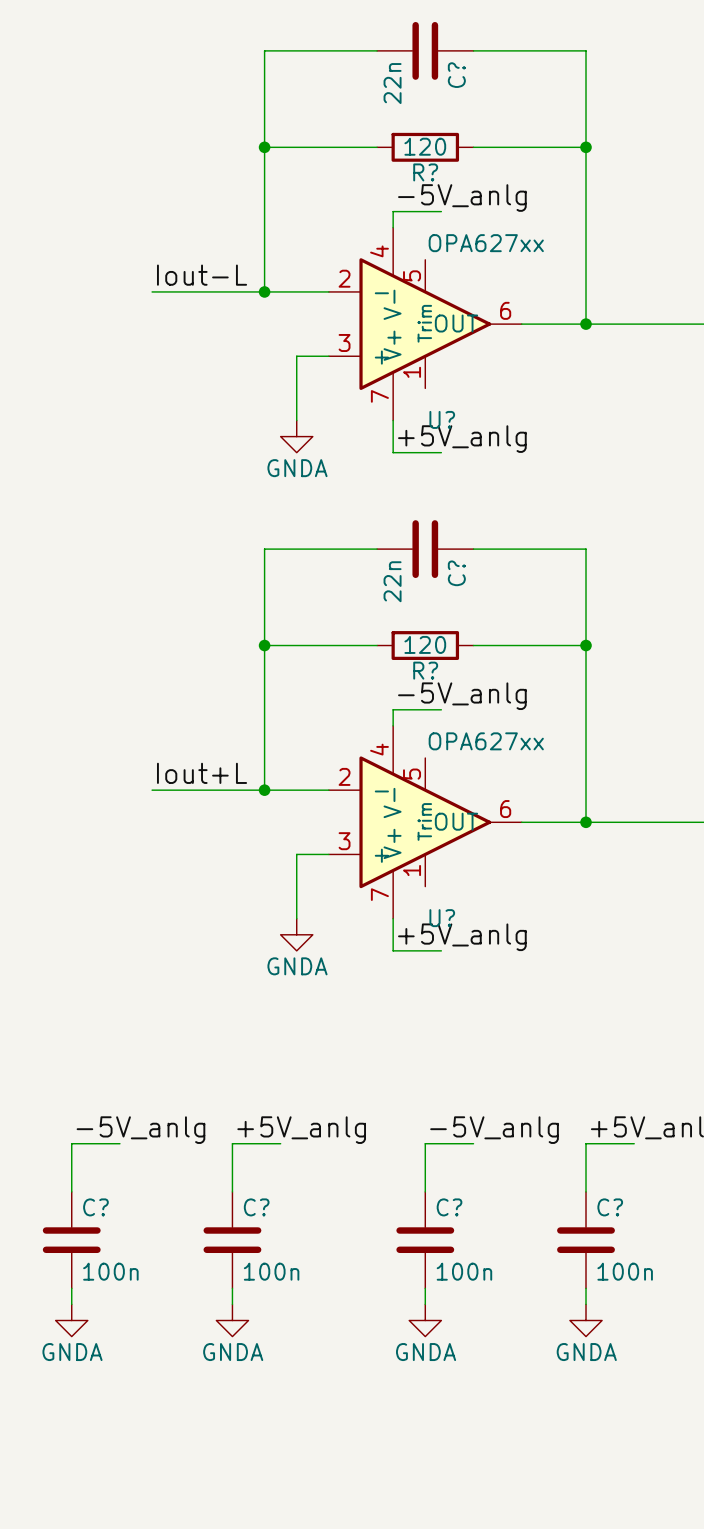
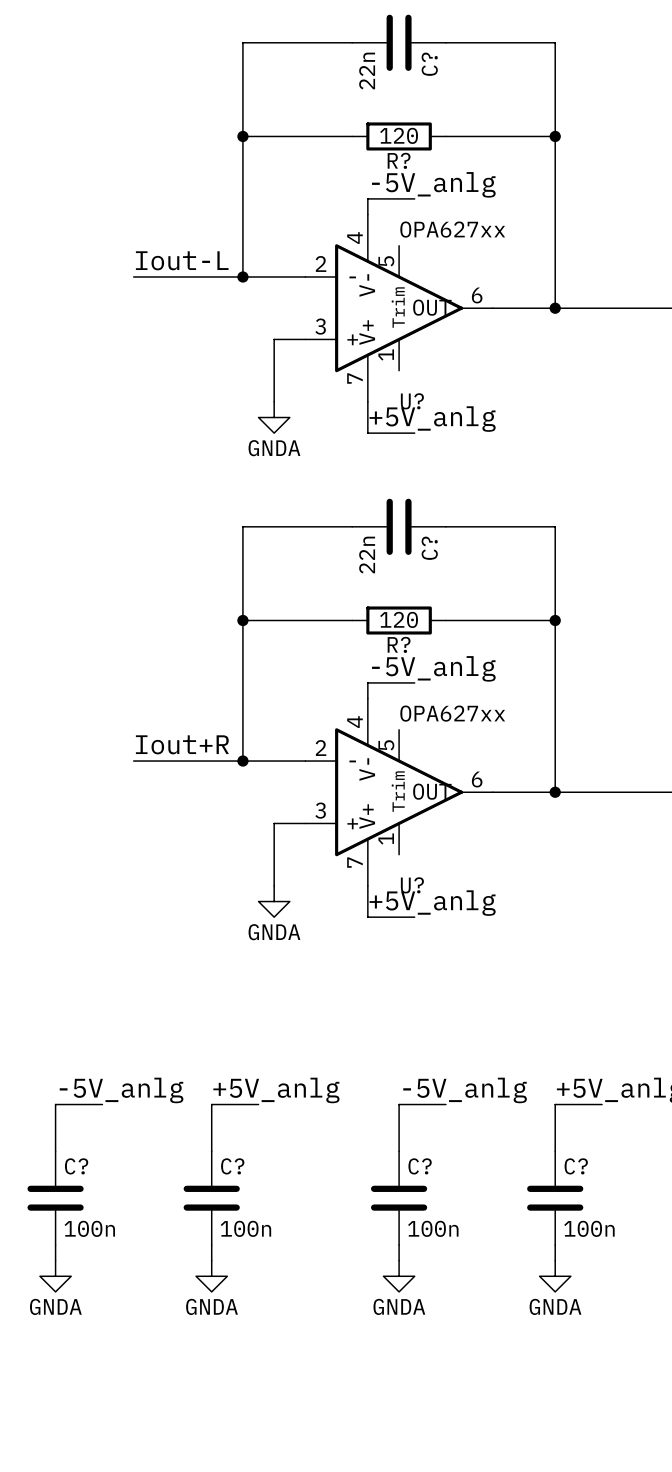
label: Iout+L (202, 773) -> Iout+R (182, 744)

